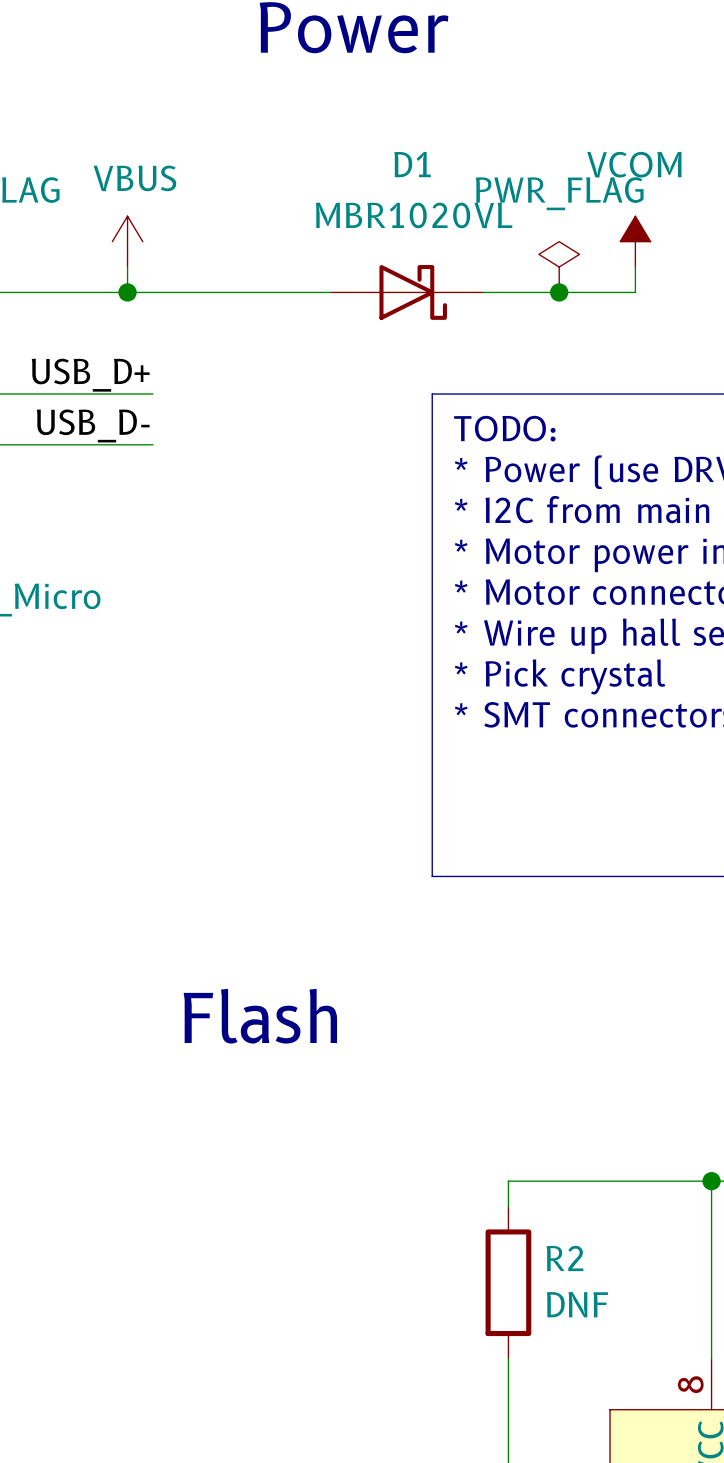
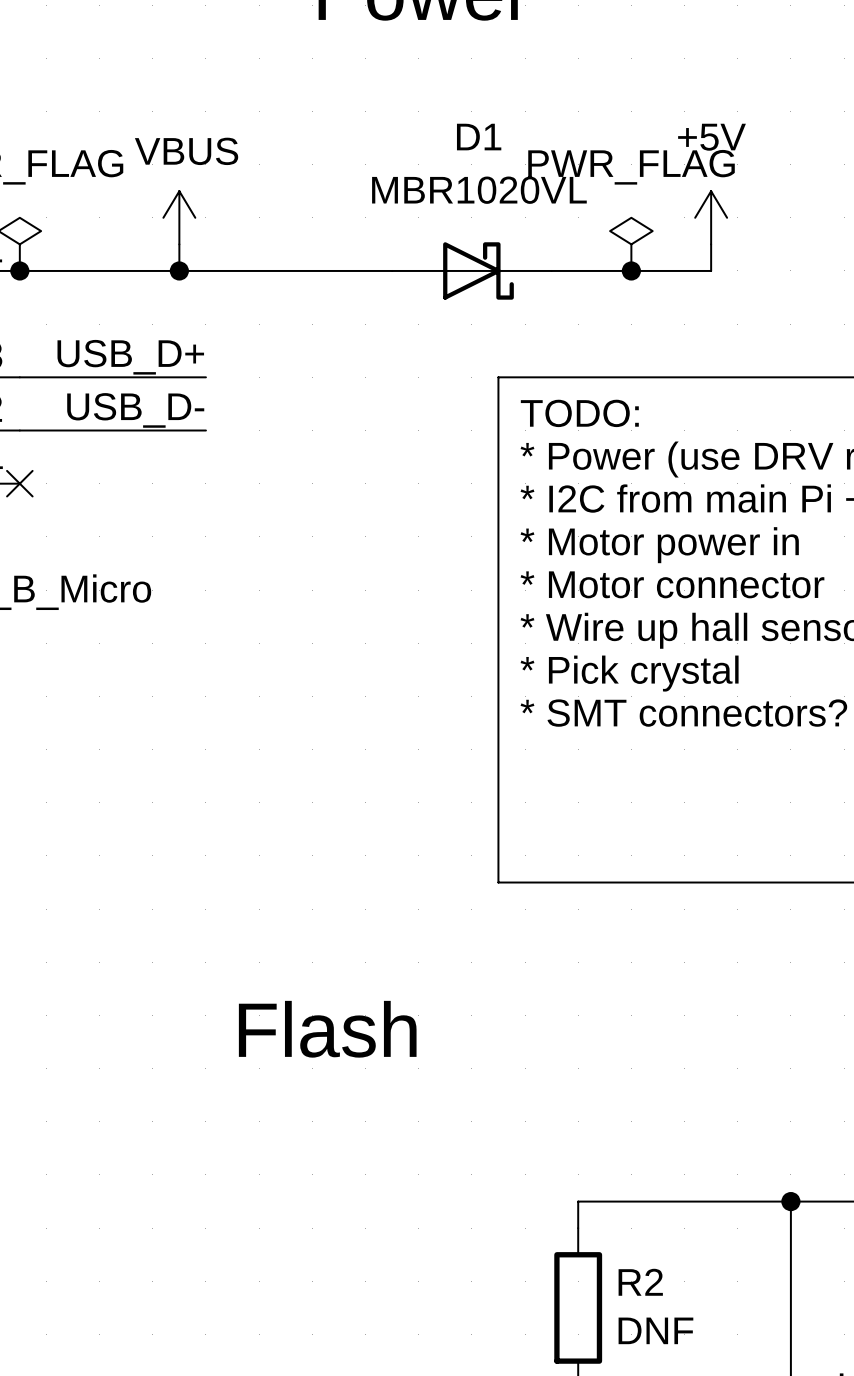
power symbol: VCOM (635, 241) -> +5V (711, 217)

